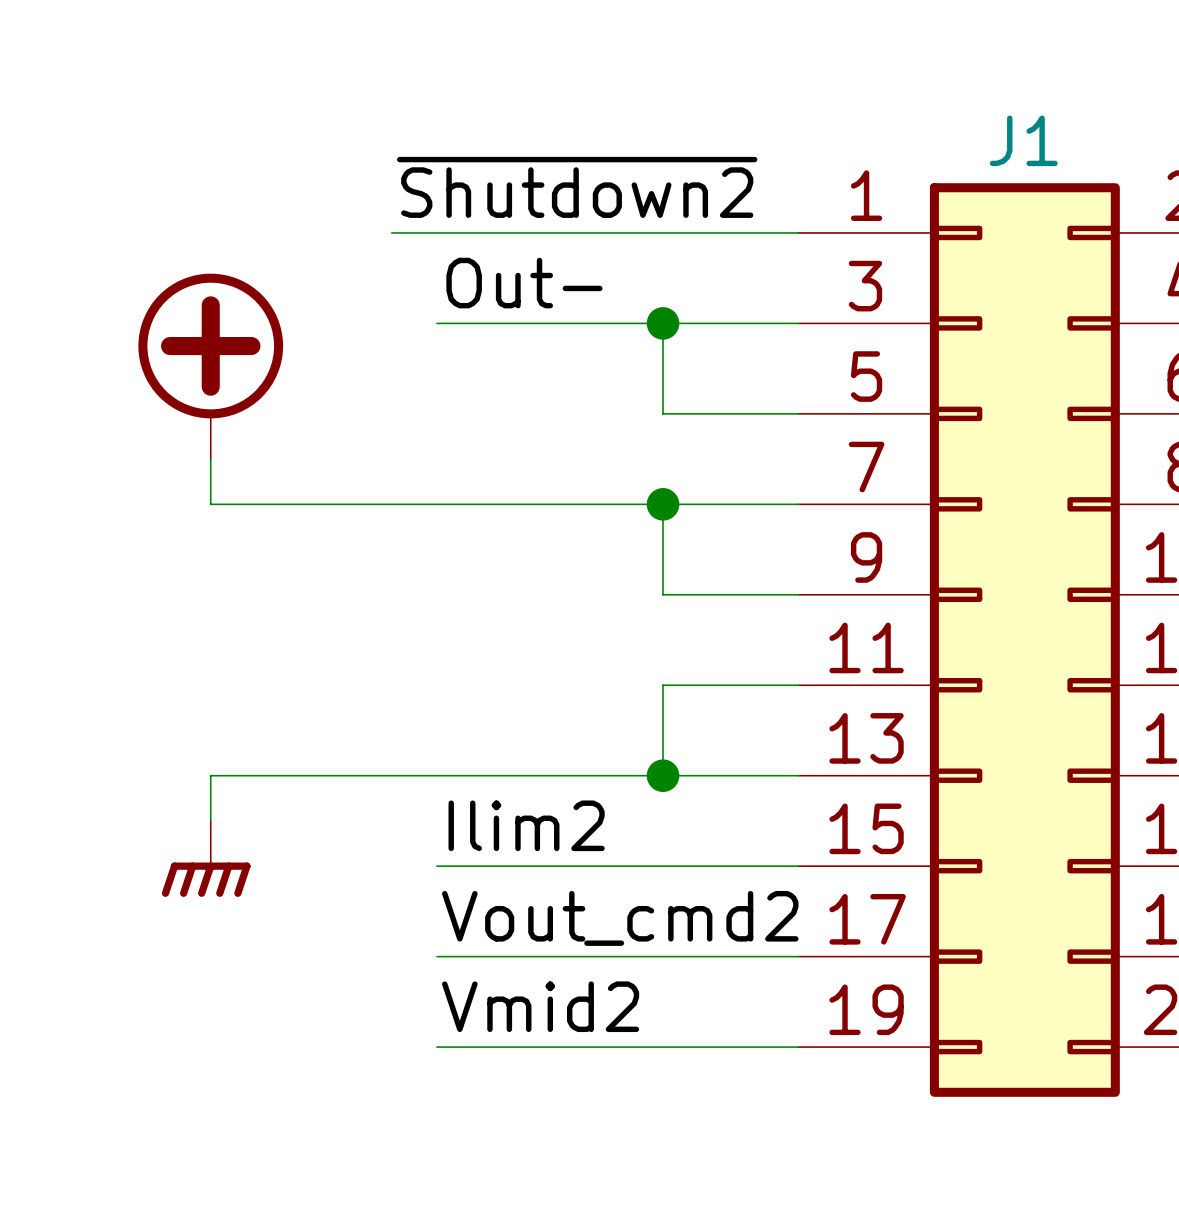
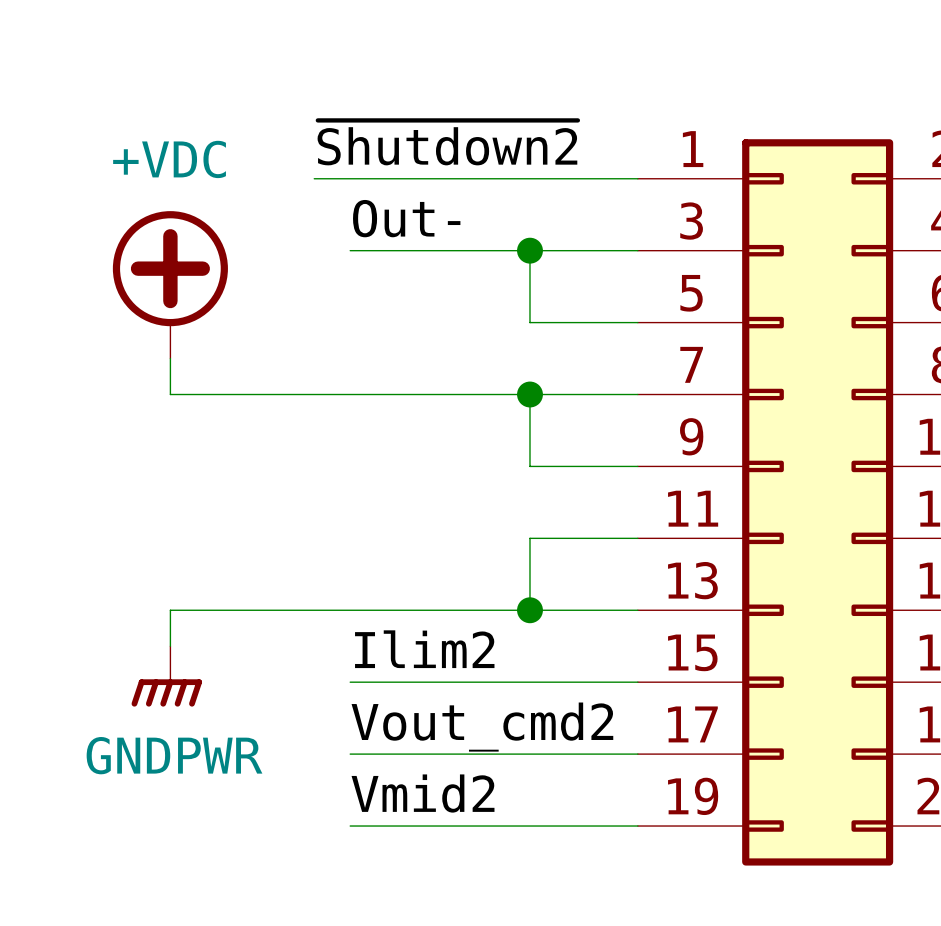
J1 name: J1 (1023, 140) -> none
power symbol text: none -> +VDC (169, 159)
power symbol text: none -> GNDPWR (174, 755)

